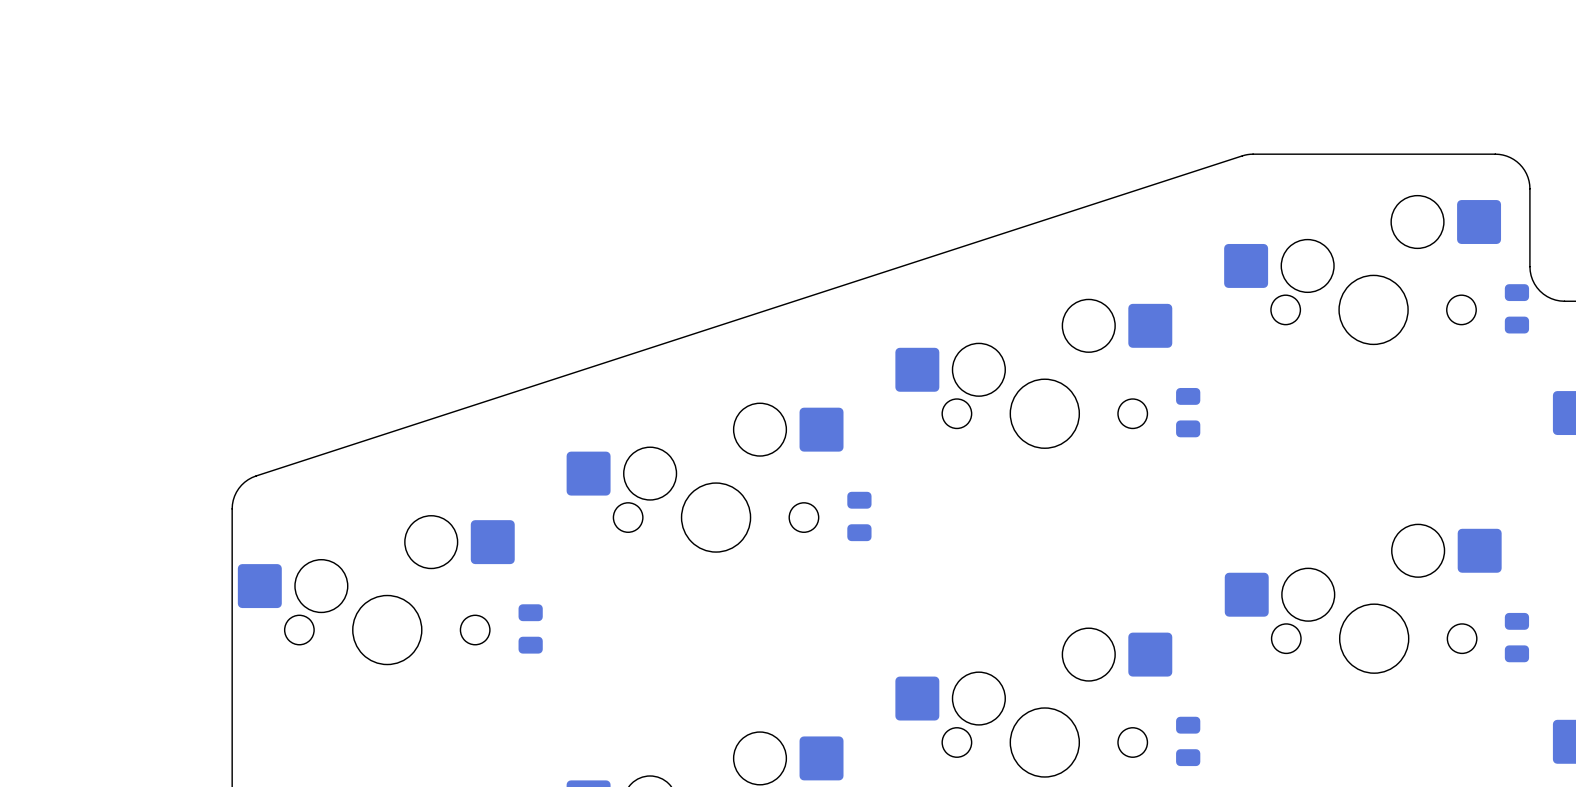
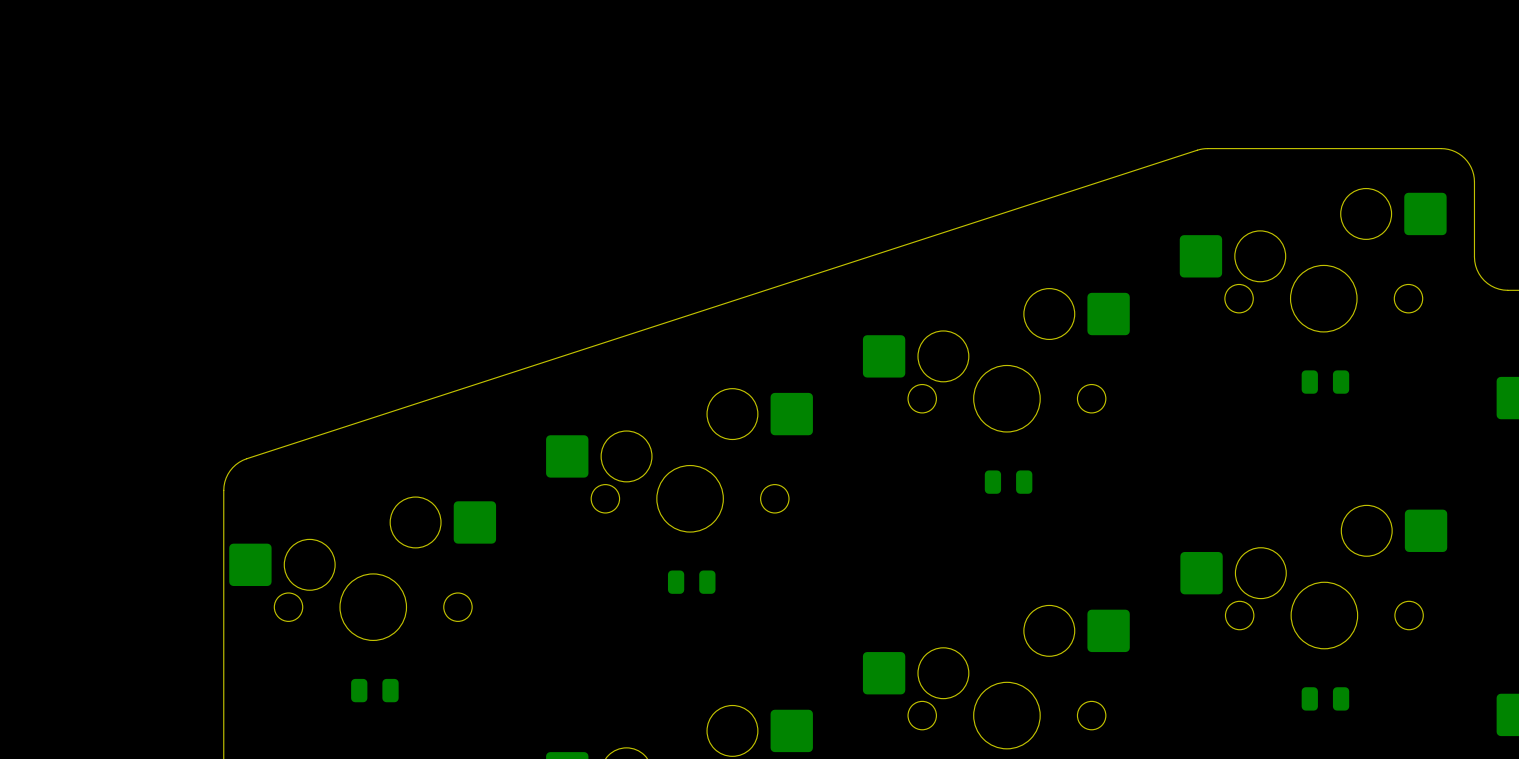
part: (1516, 308) -> none
part: none -> (1325, 382)
part: (1188, 412) -> none
part: none -> (1008, 482)
part: (859, 516) -> none
part: none -> (691, 582)
part: (530, 628) -> none
part: (1516, 637) -> none
part: none -> (374, 690)
part: none -> (1325, 698)
part: (1188, 741) -> none

